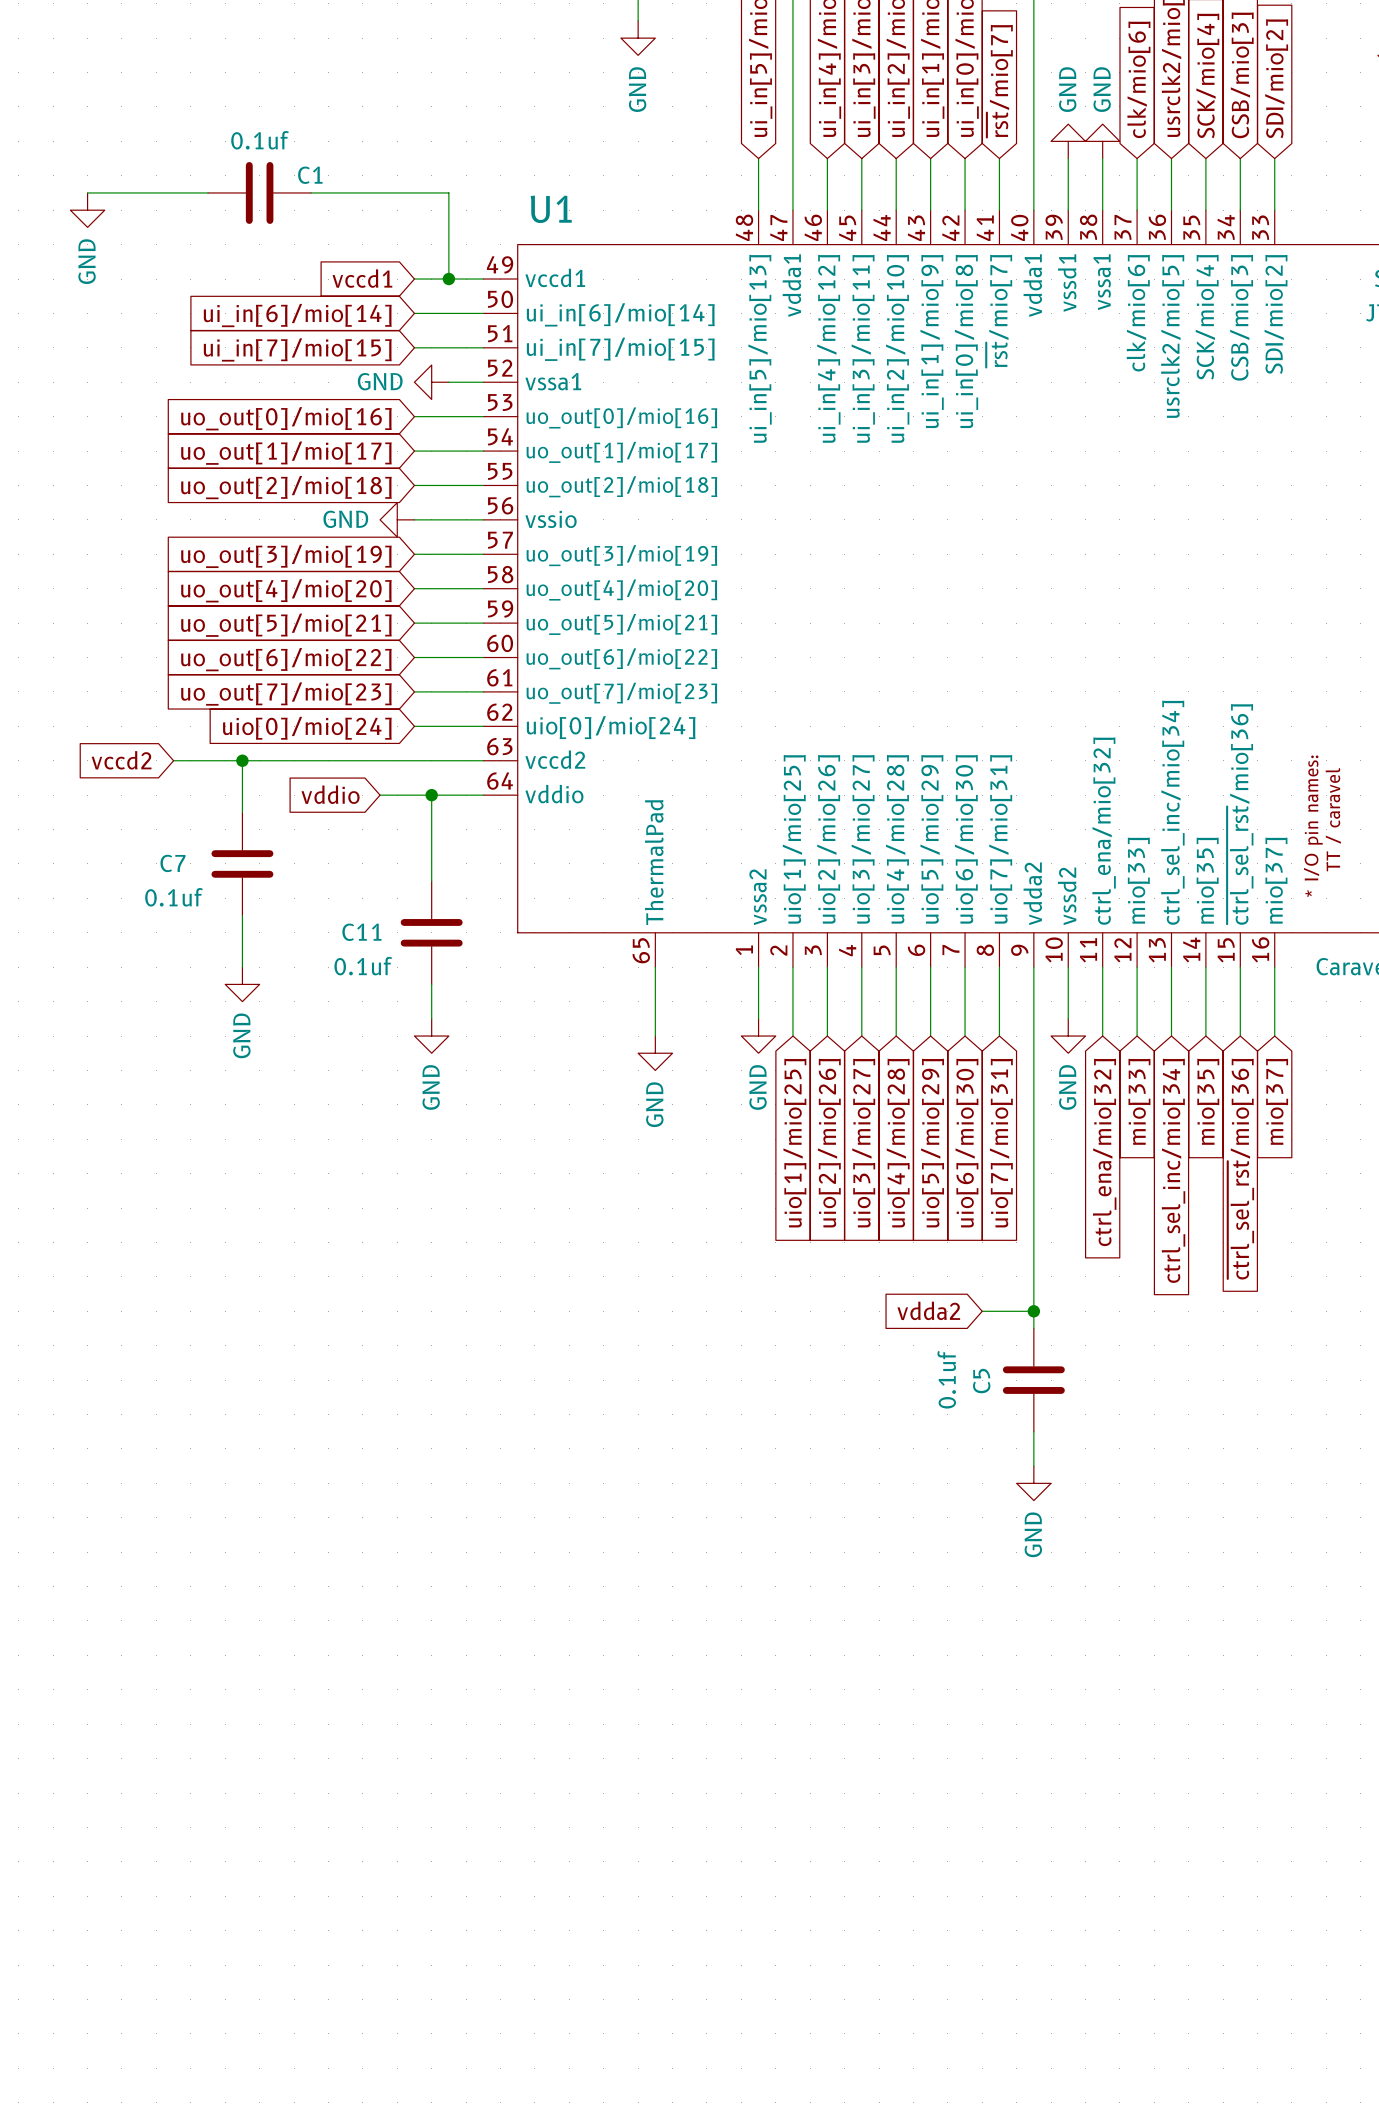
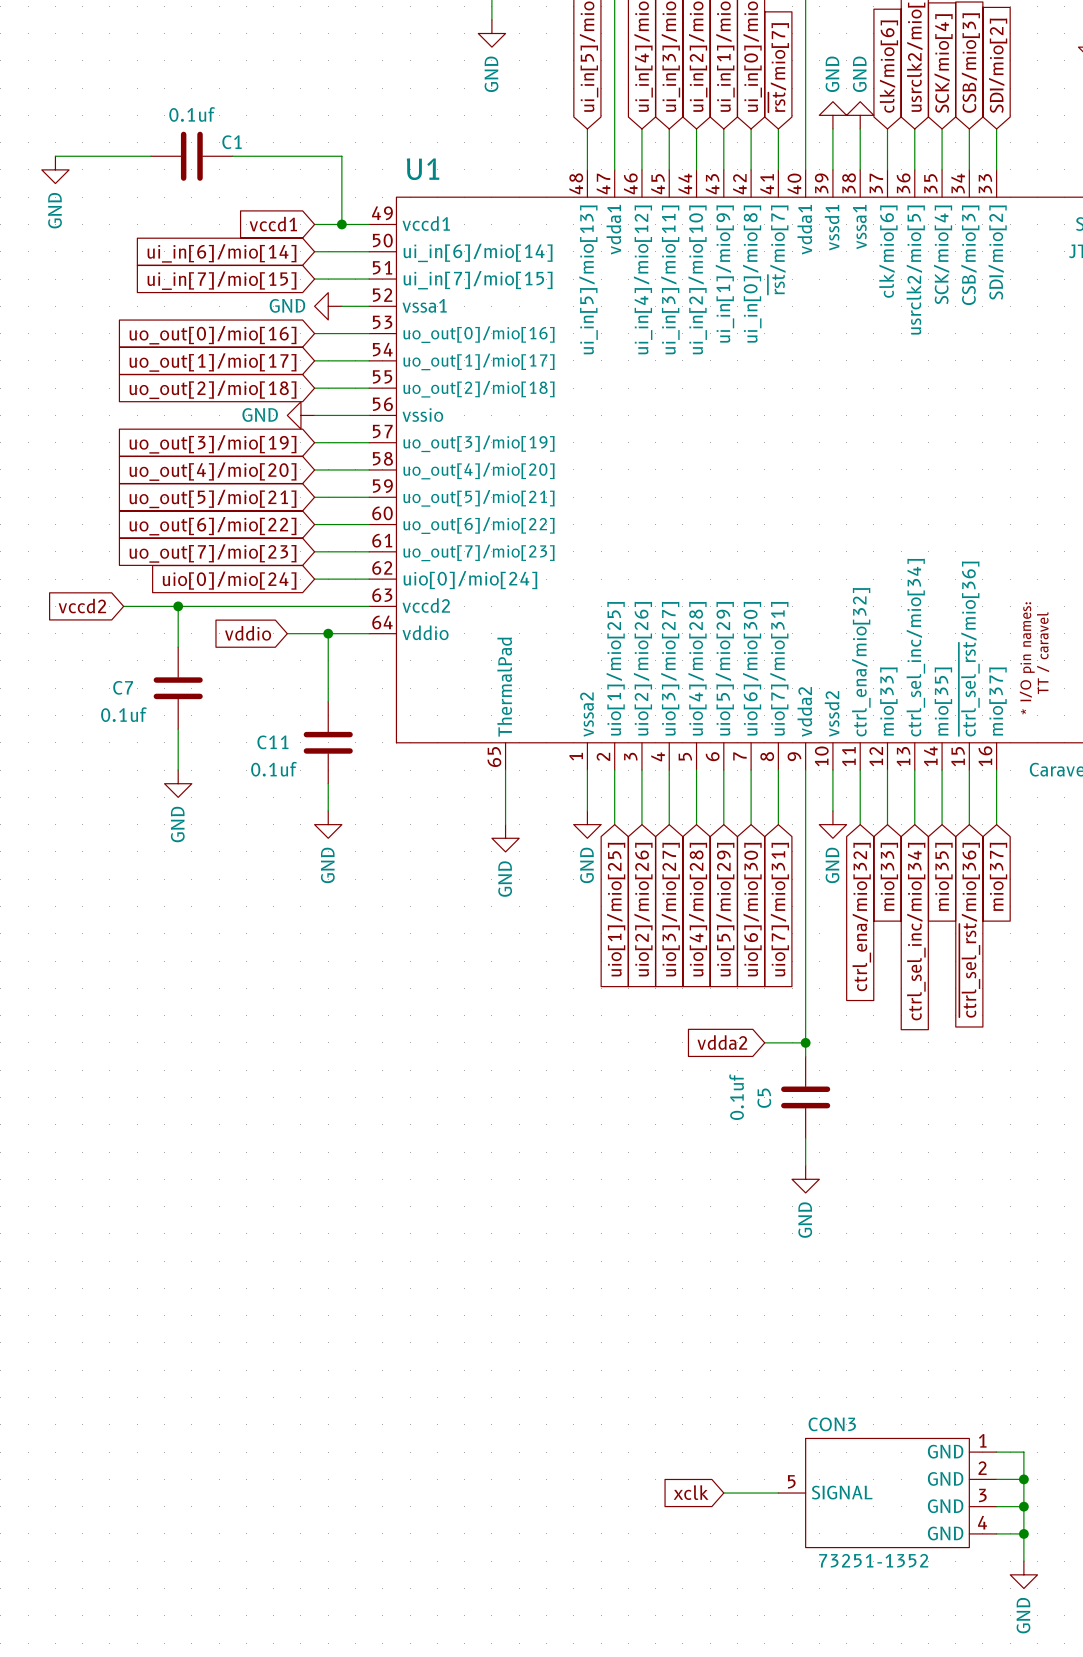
wire: none -> (996, 1452) (1023, 1452) (1023, 1561)
wire: none -> (996, 1479) (1023, 1479)
junction: none -> (1023, 1479)
global label: none -> xclk (691, 1492)
wire: none -> (723, 1493) (778, 1493)
CON3: none -> 73251-1352 (887, 1493)
wire: none -> (996, 1506) (1023, 1506)
junction: none -> (1023, 1506)
wire: none -> (996, 1533) (1023, 1533)
junction: none -> (1023, 1533)
power symbol: none -> GND (1023, 1574)

